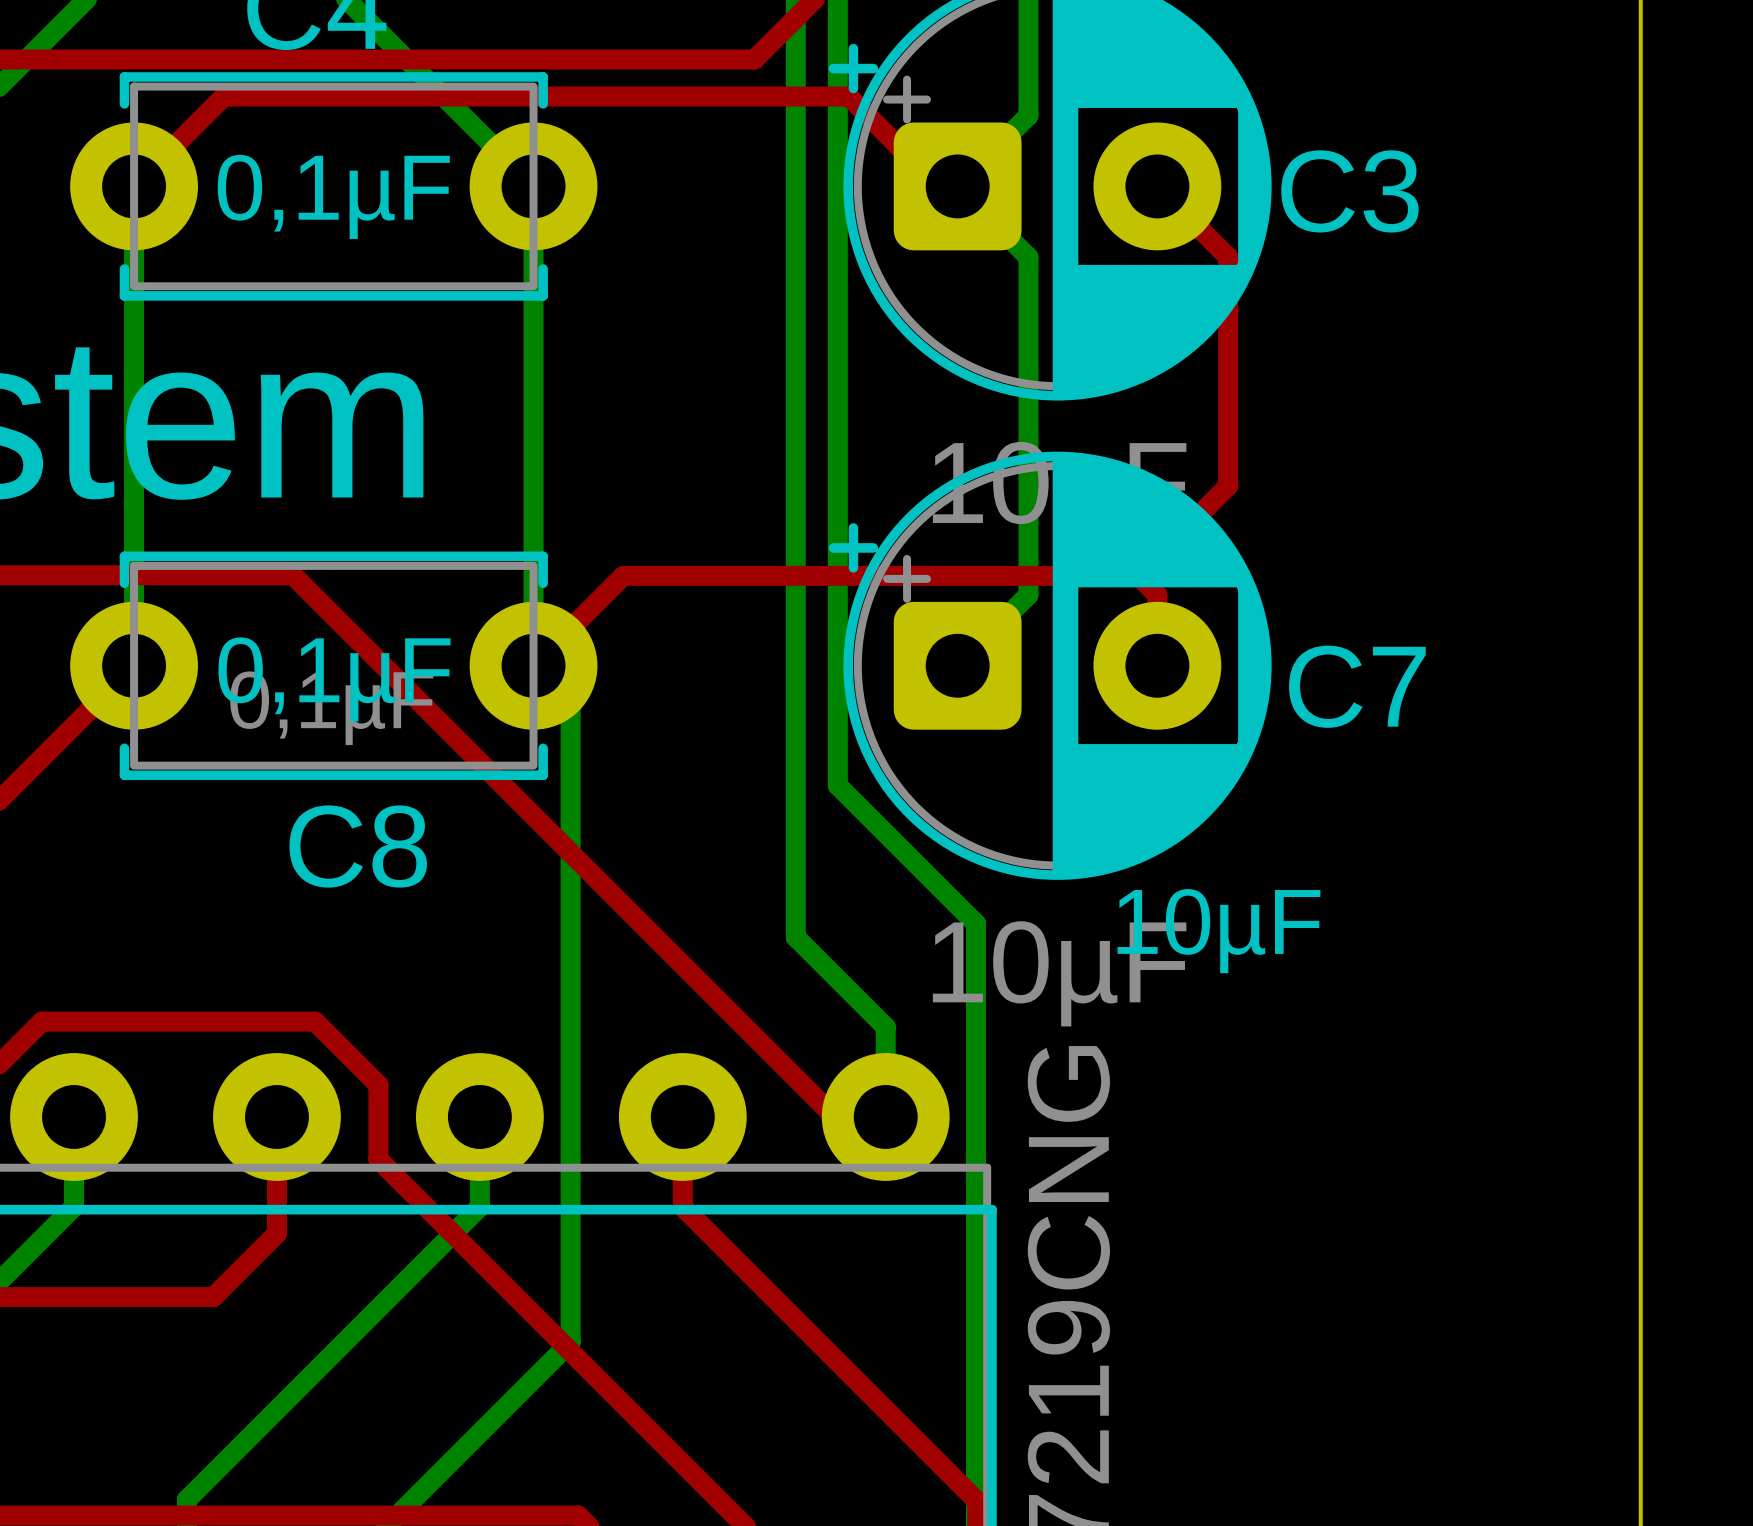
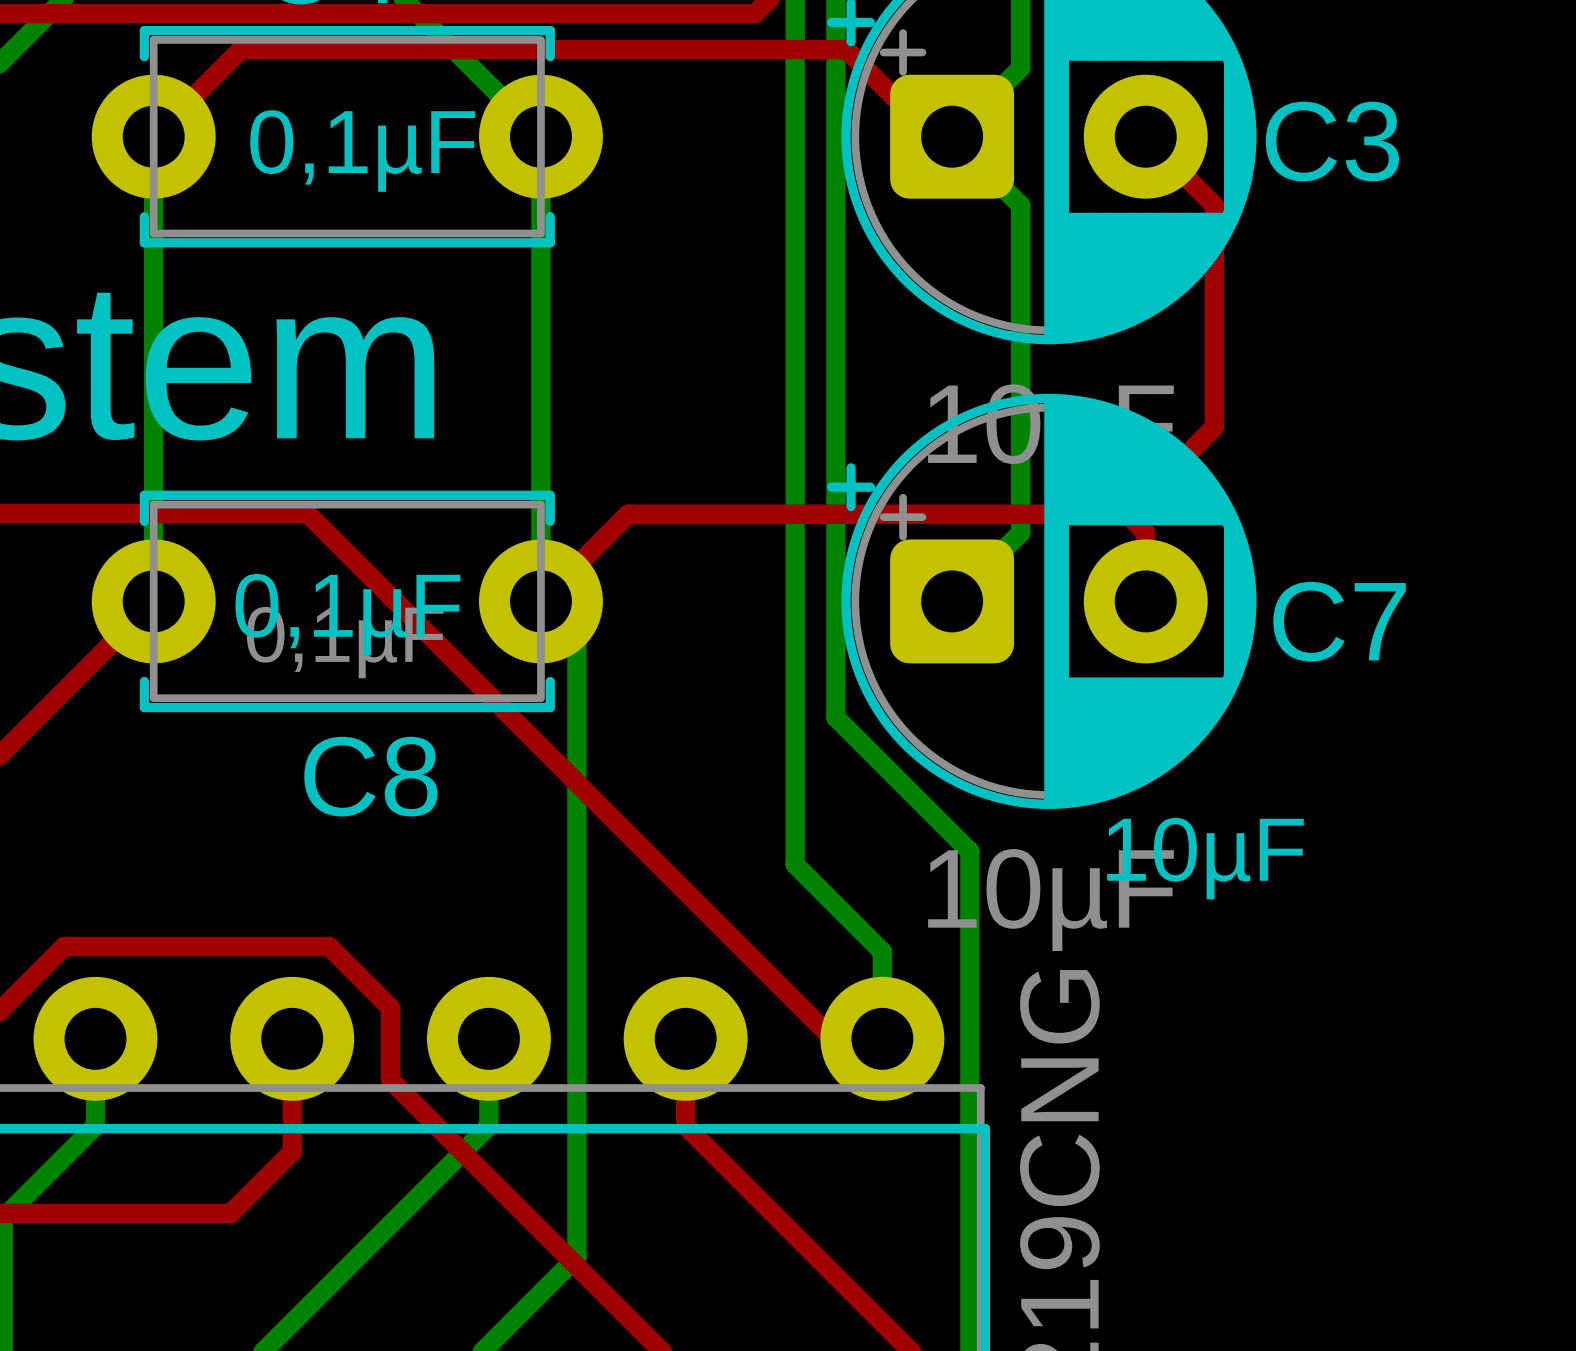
text position: 0,1µF (333, 196) -> 0,1µF (362, 151)

